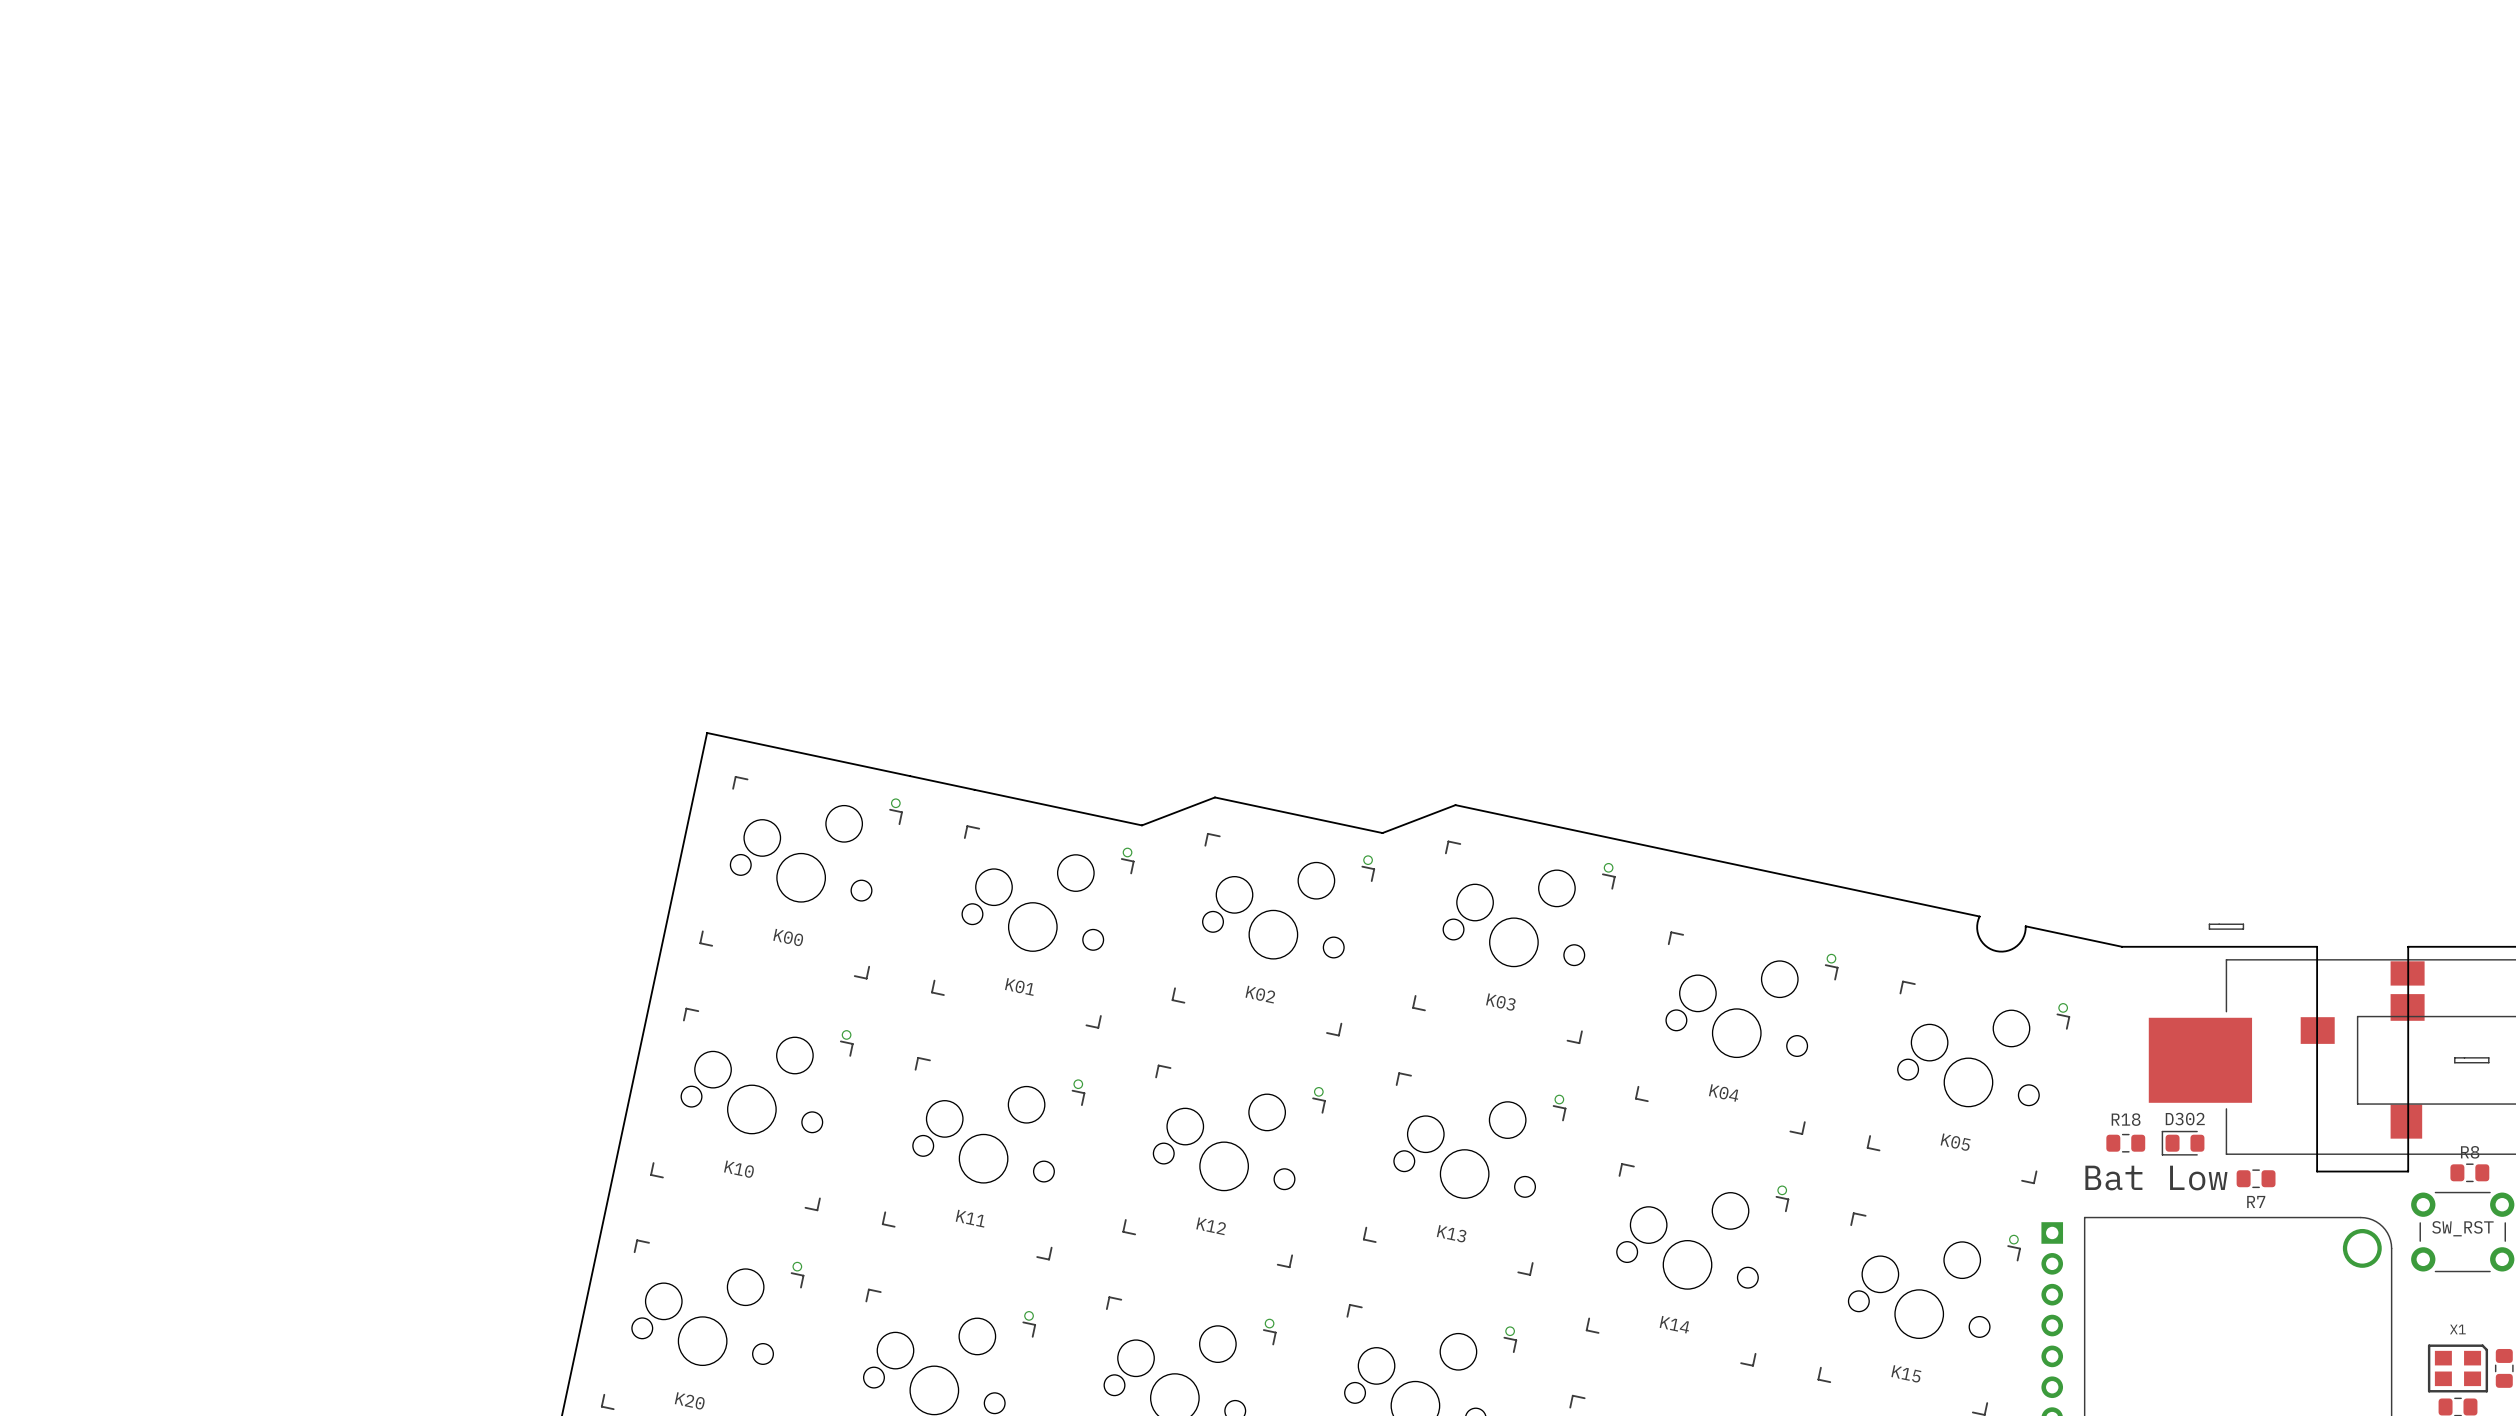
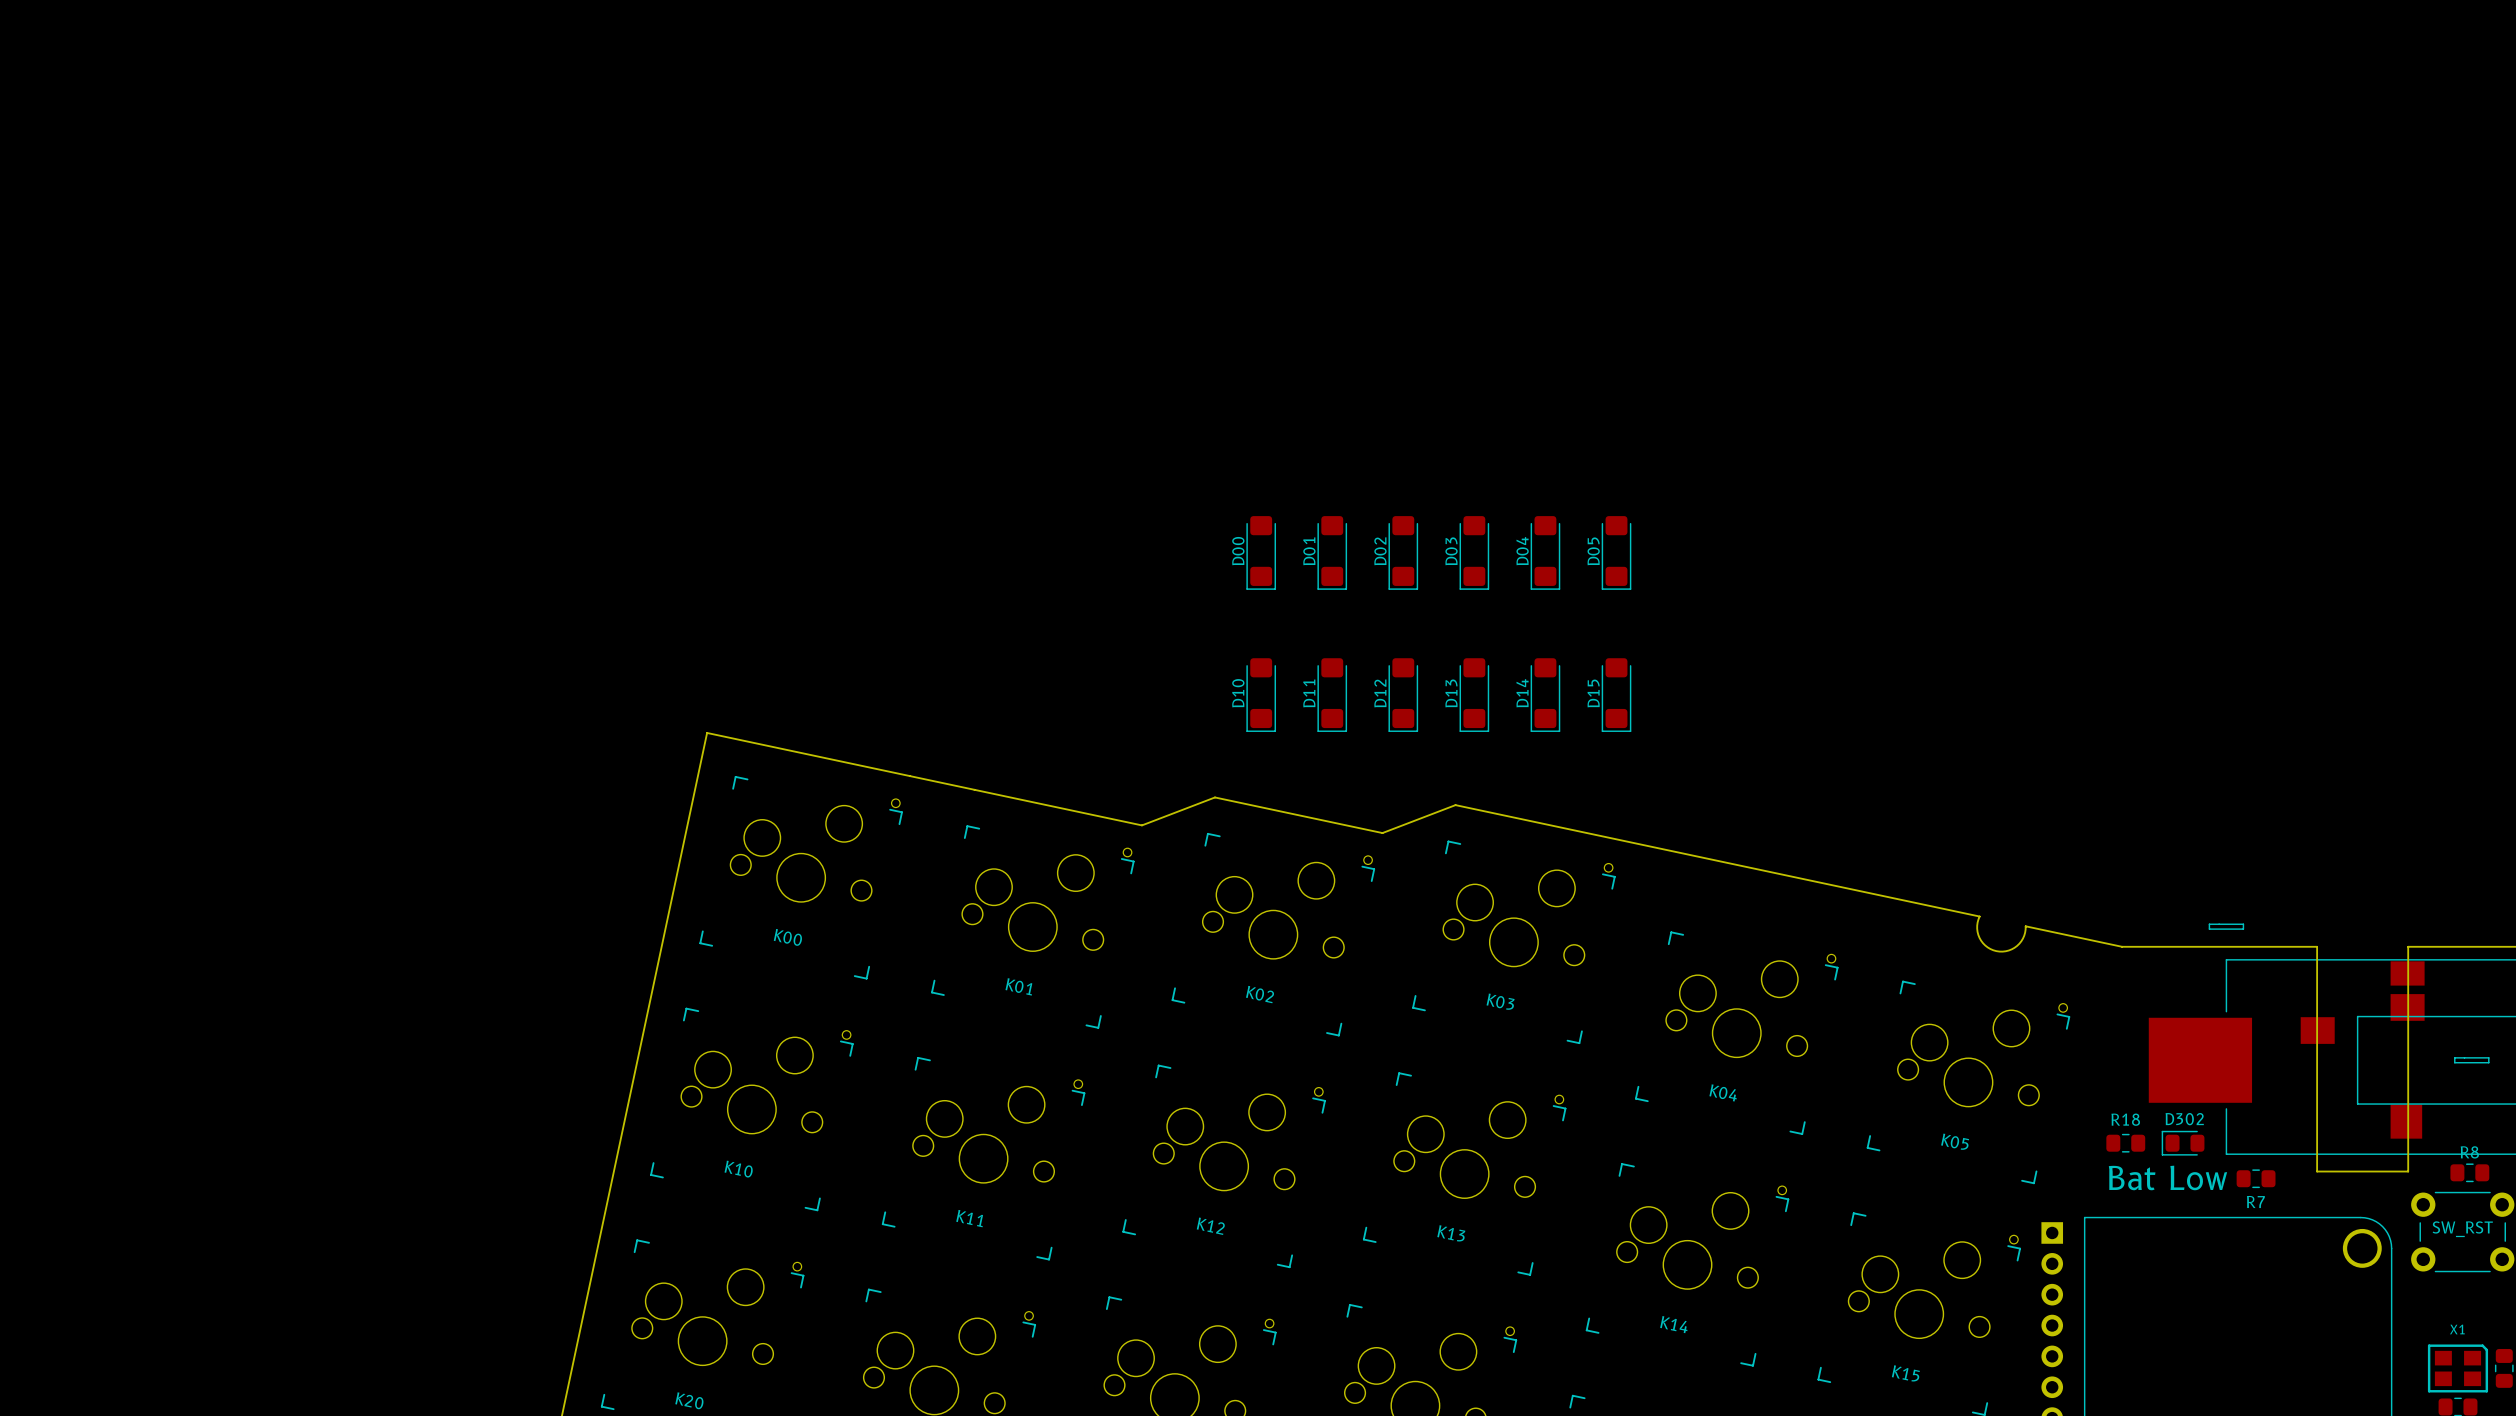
D00: none -> (1261, 552)
D01: none -> (1332, 552)
D02: none -> (1403, 552)
D03: none -> (1474, 552)
D04: none -> (1545, 552)
D05: none -> (1616, 552)
D10: none -> (1261, 695)
D11: none -> (1332, 695)
D12: none -> (1403, 695)
D13: none -> (1474, 695)
D14: none -> (1545, 695)
D15: none -> (1616, 695)

